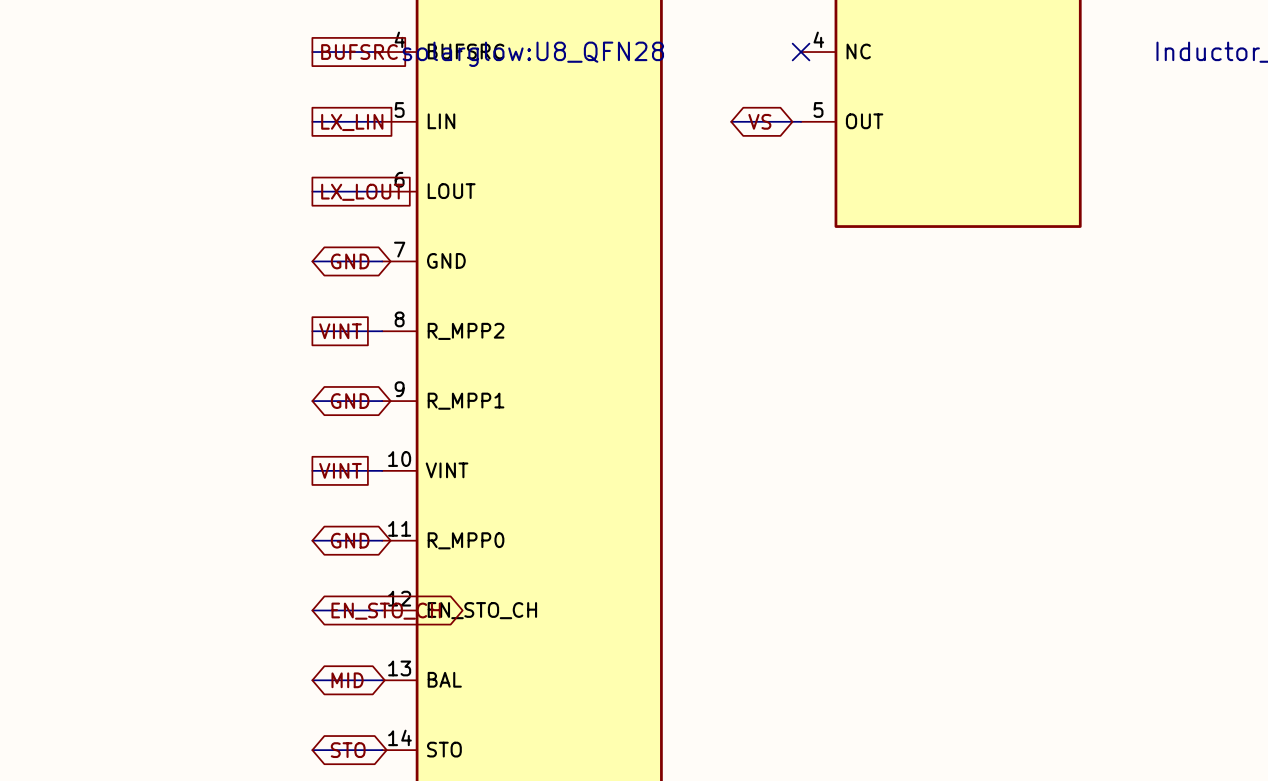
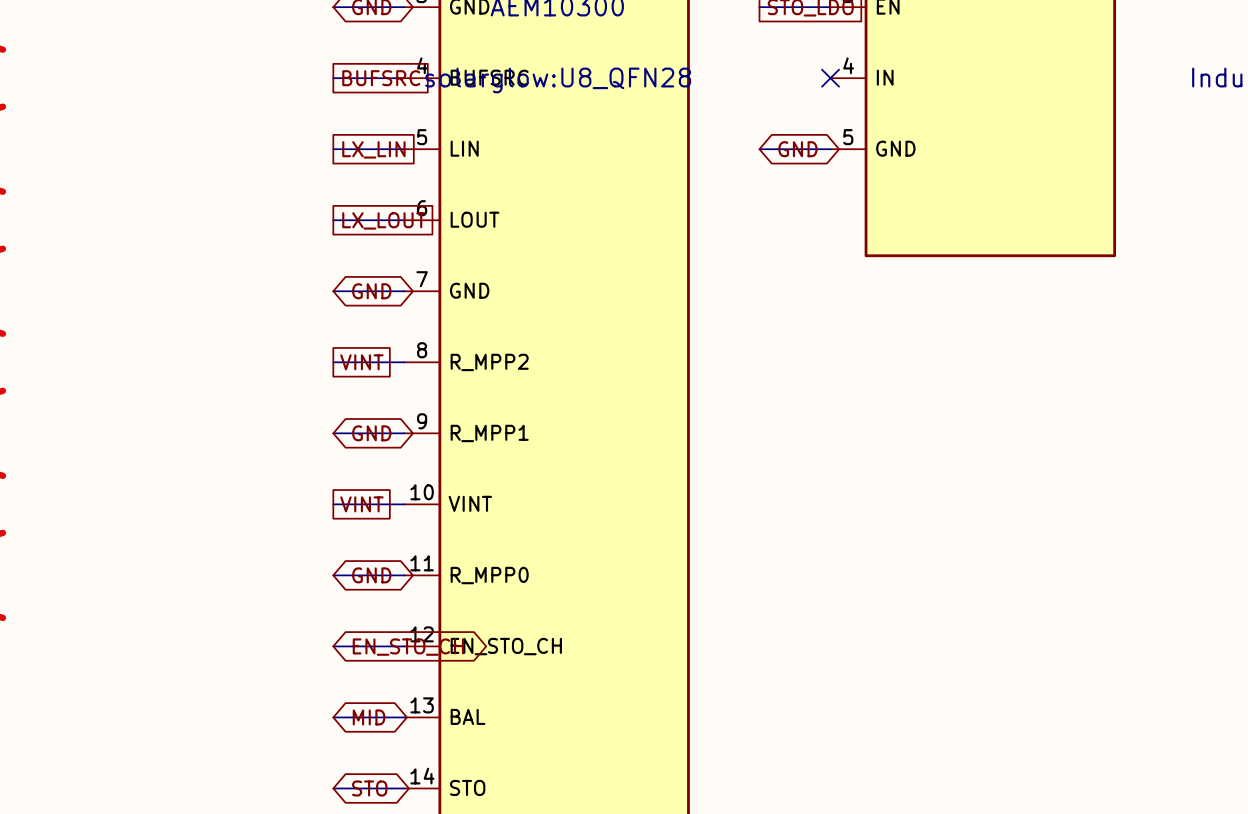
part pin name: NC (858, 51) -> IN (885, 77)
global label: VS (759, 121) -> GND (797, 149)
part pin name: OUT (864, 121) -> GND (895, 148)

